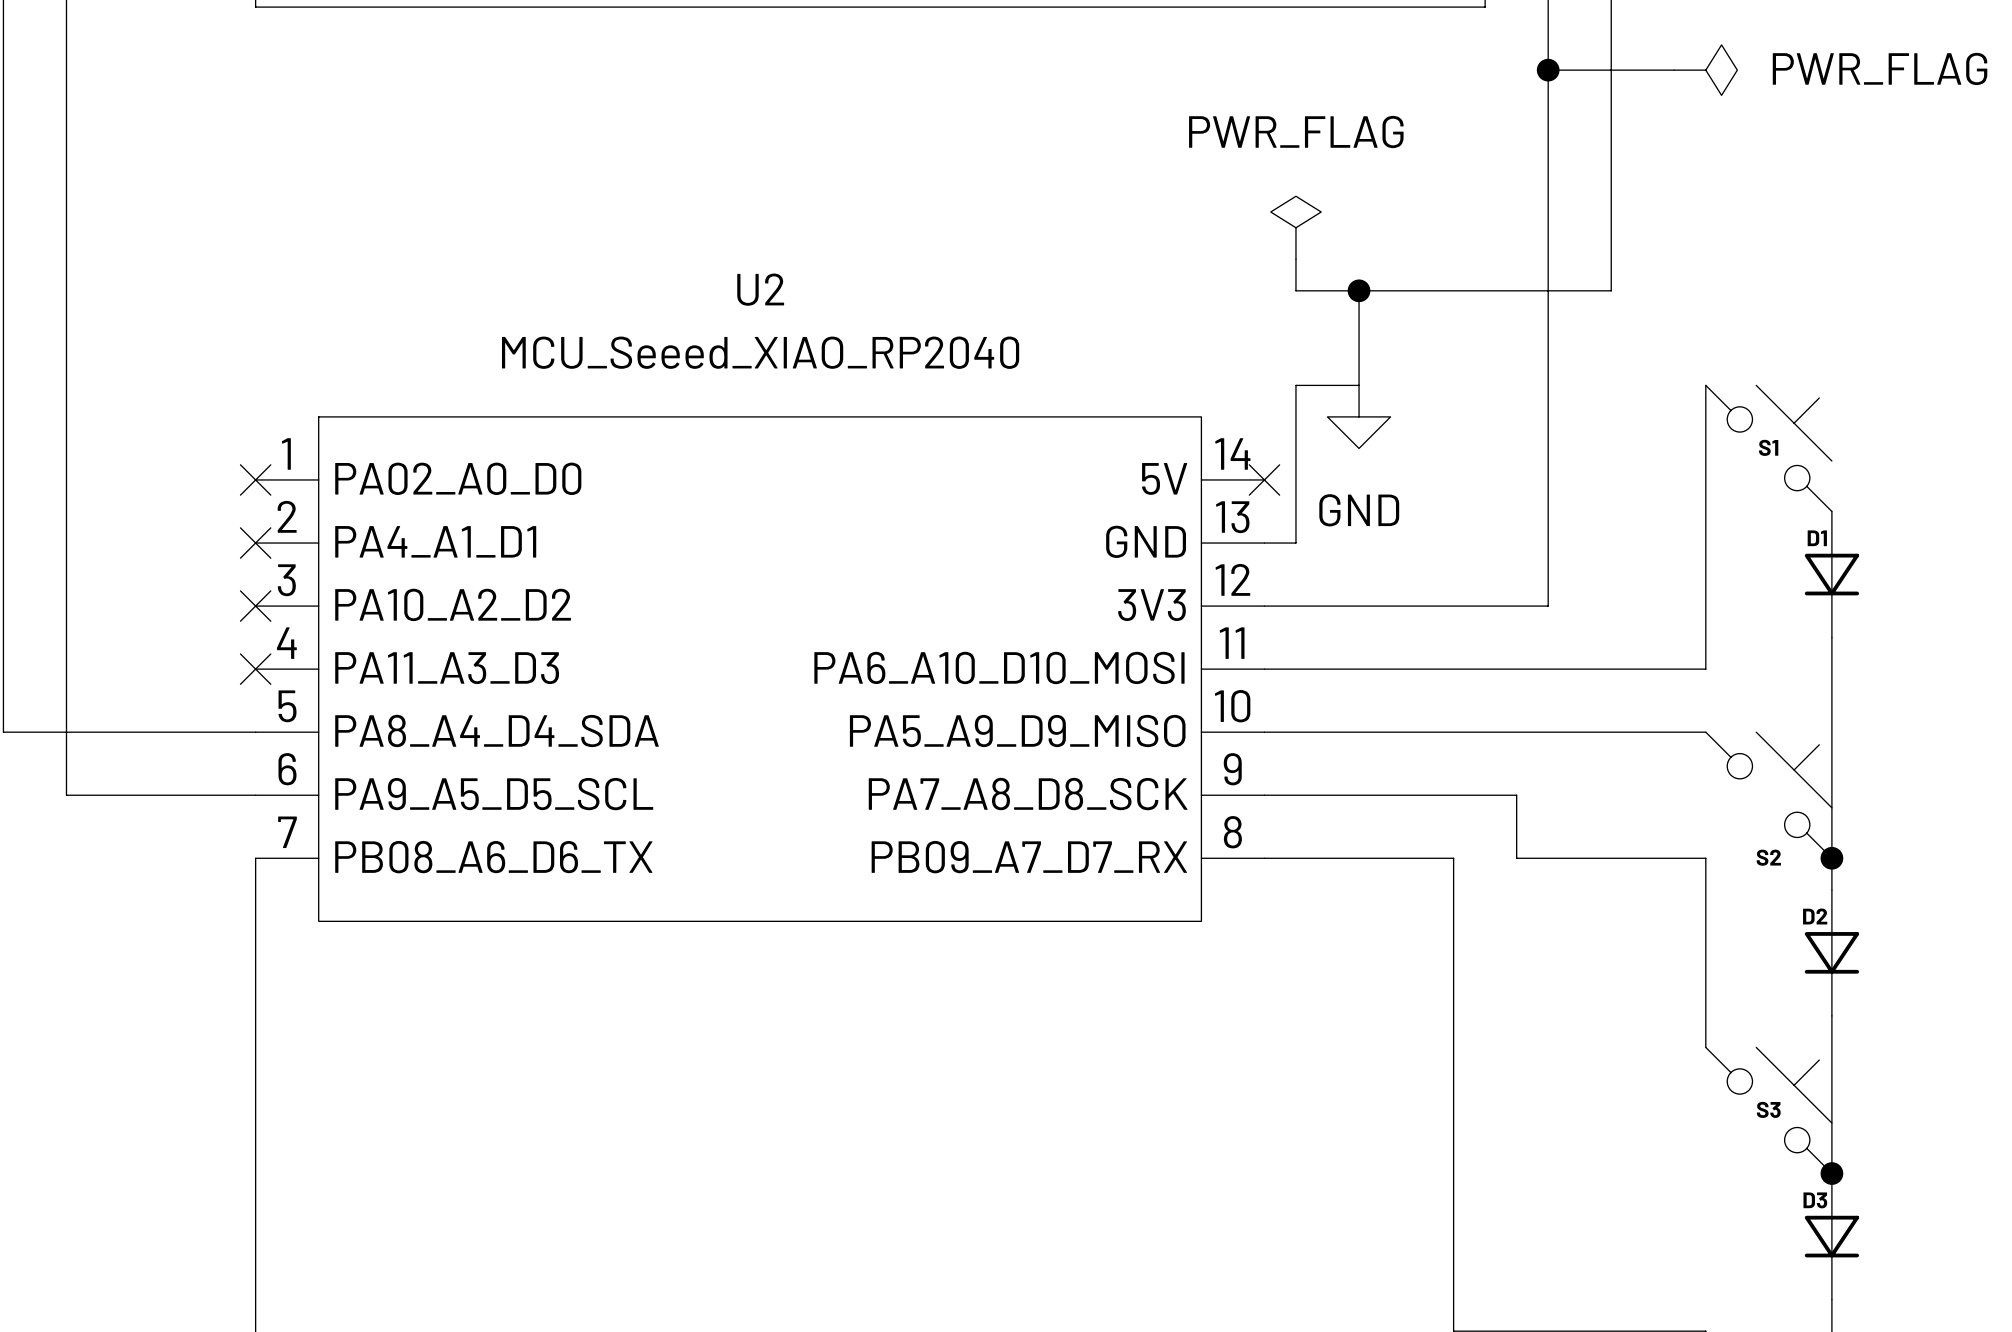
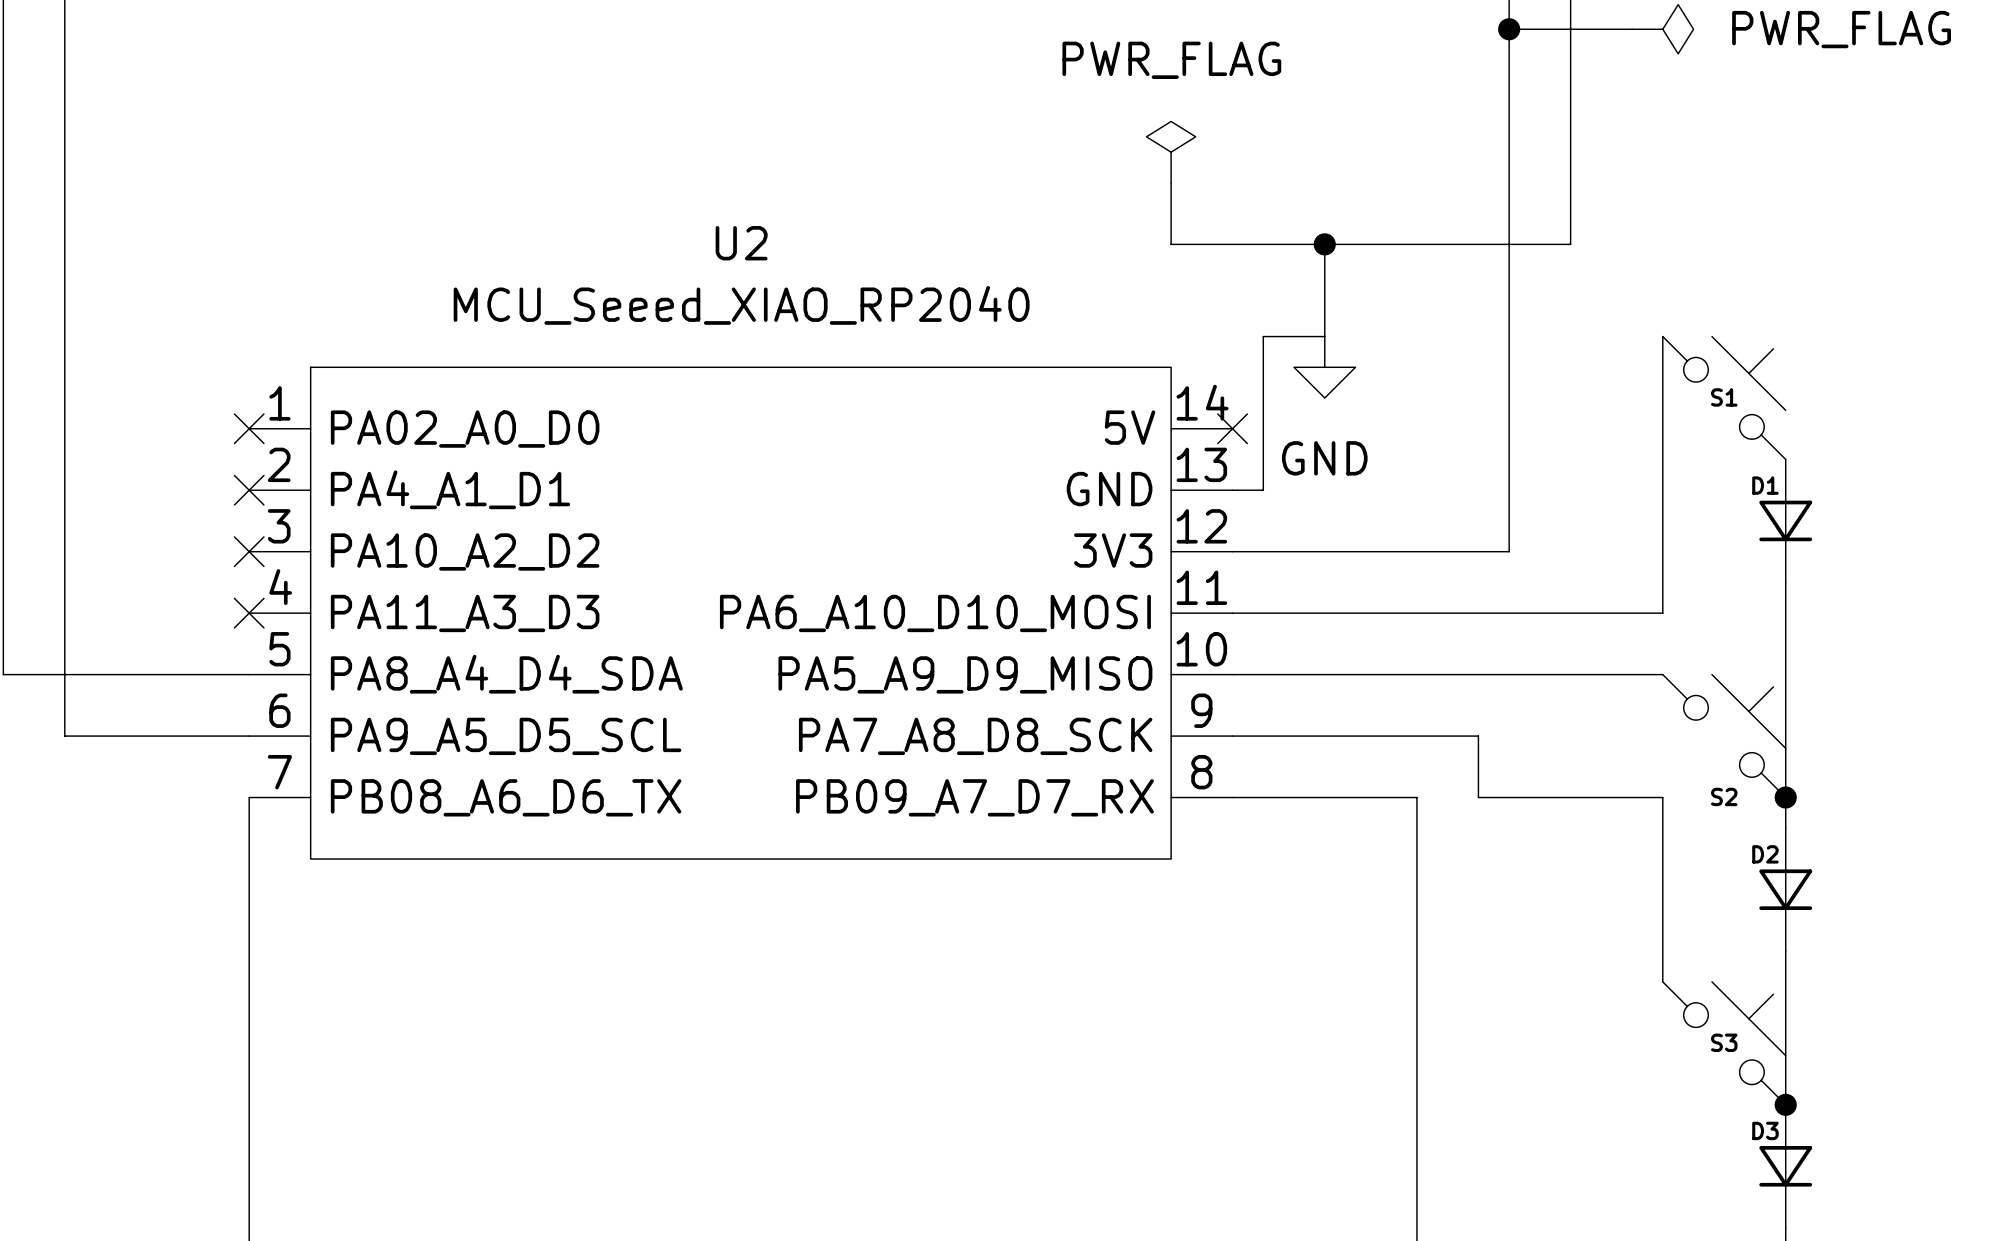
power symbol position: PWR_FLAG (1295, 227) -> PWR_FLAG (1171, 152)
wire: (1295, 259) (1295, 290) -> (1171, 182) (1171, 244) (1263, 244)

